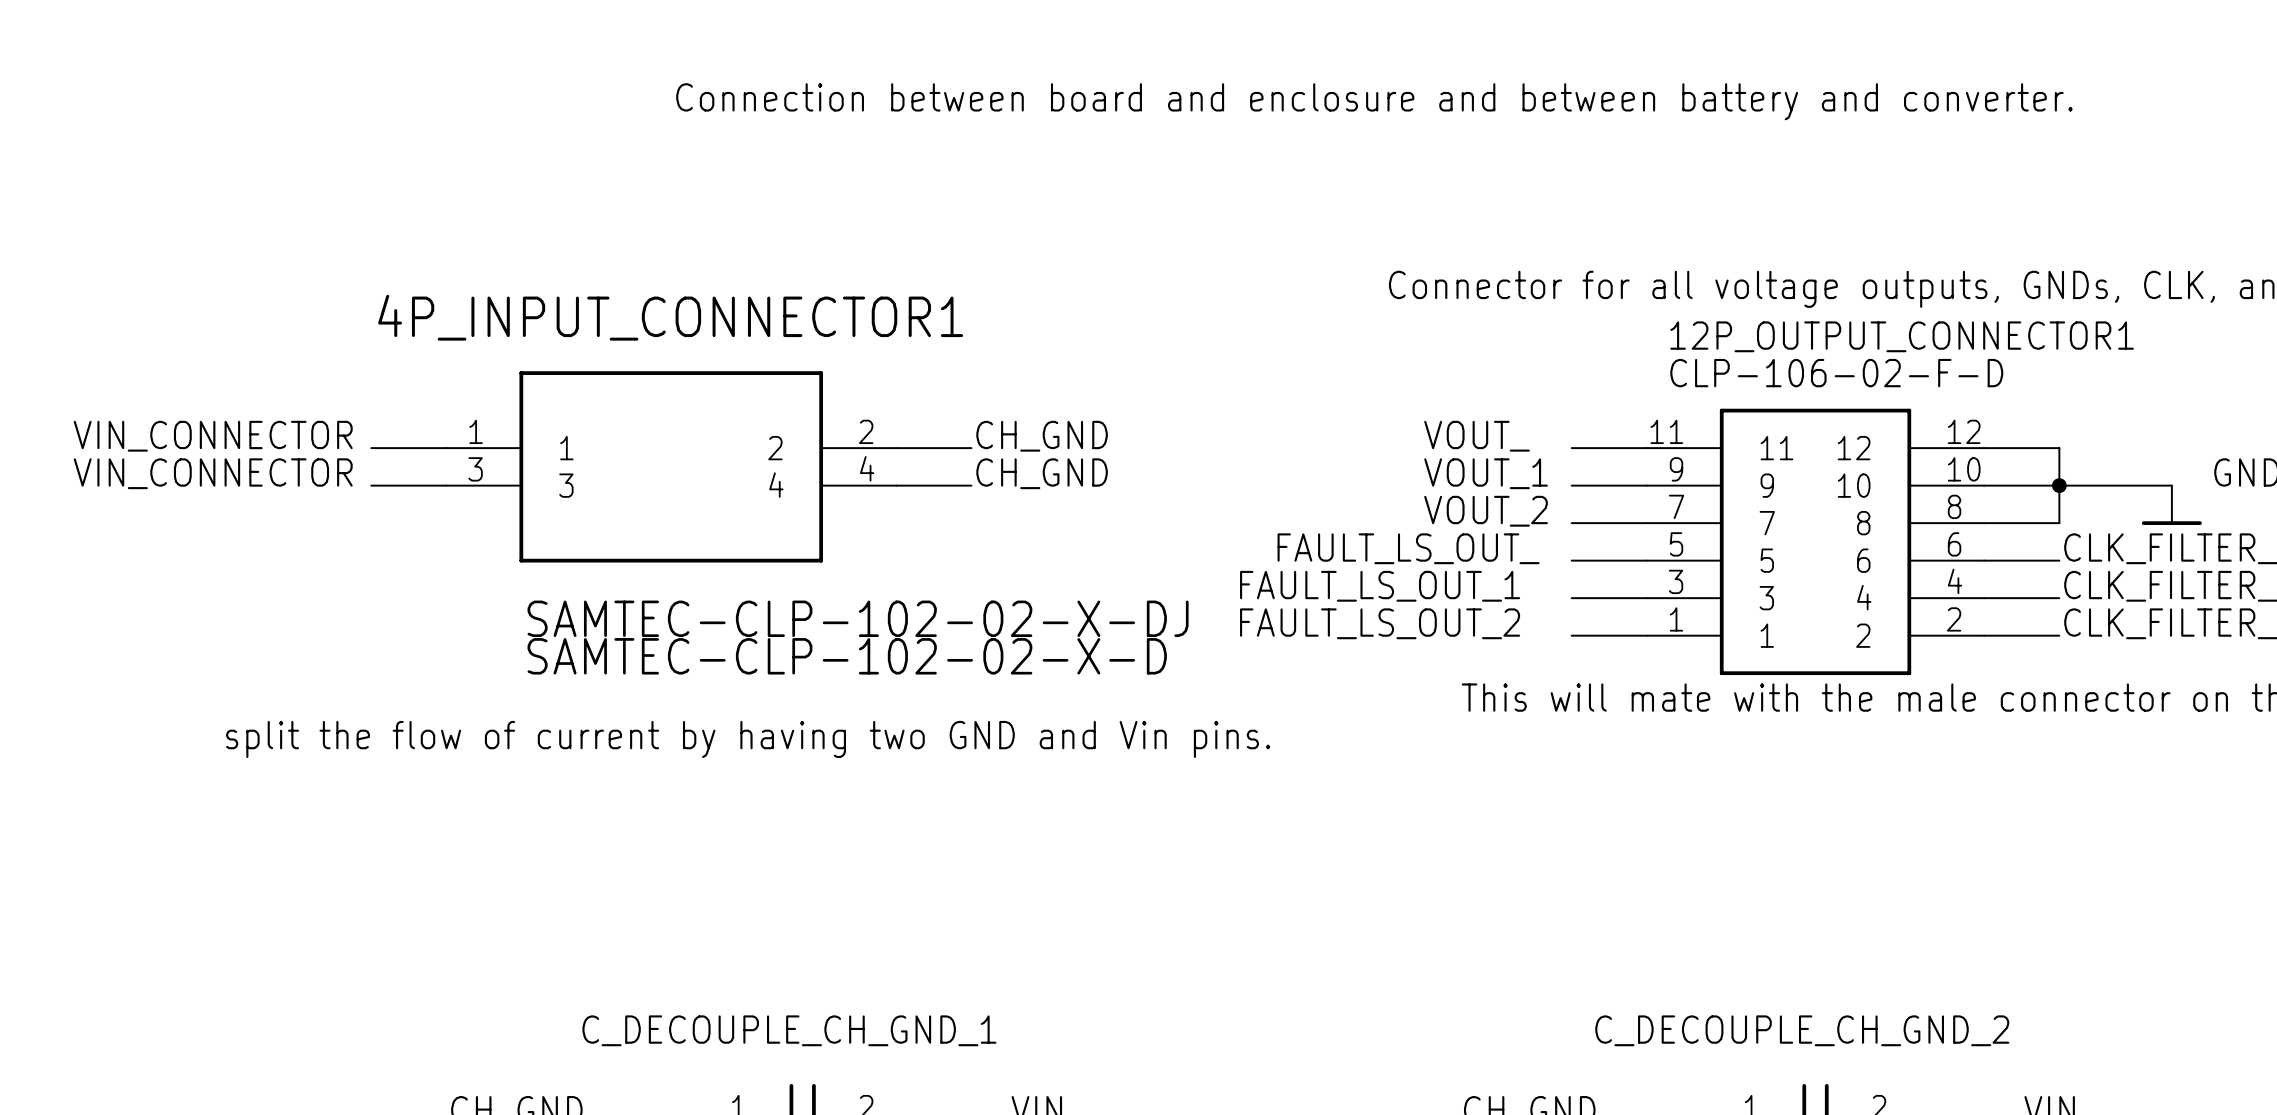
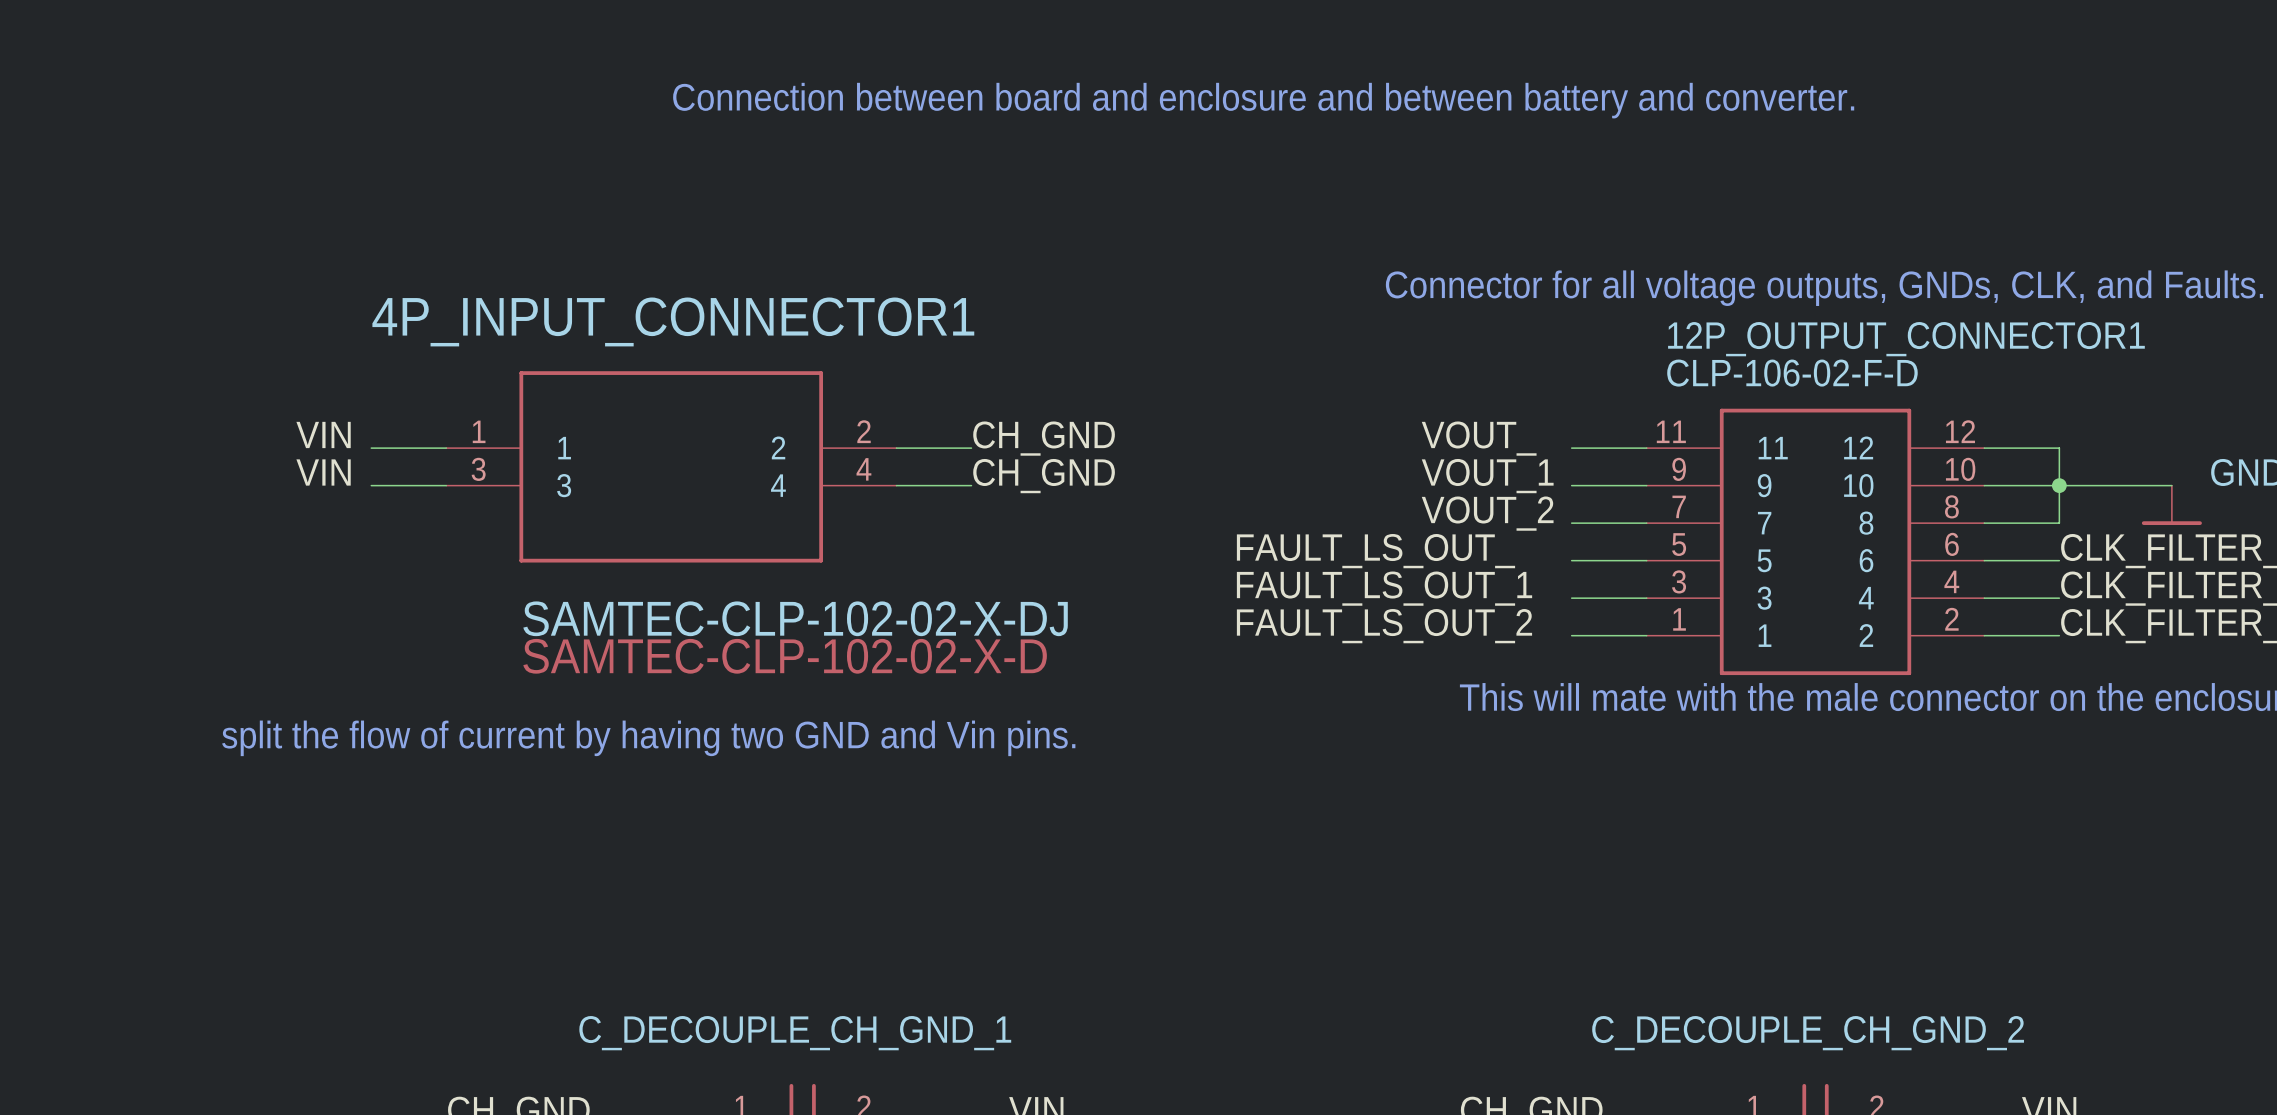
label: none -> VIN (323, 434)
label: VIN_CONNECTOR (213, 436) -> none
label: none -> VIN (323, 472)
label: VIN_CONNECTOR (213, 473) -> none
label position: FAULT_LS_OUT_ (1408, 548) -> FAULT_LS_OUT_ (1375, 551)

